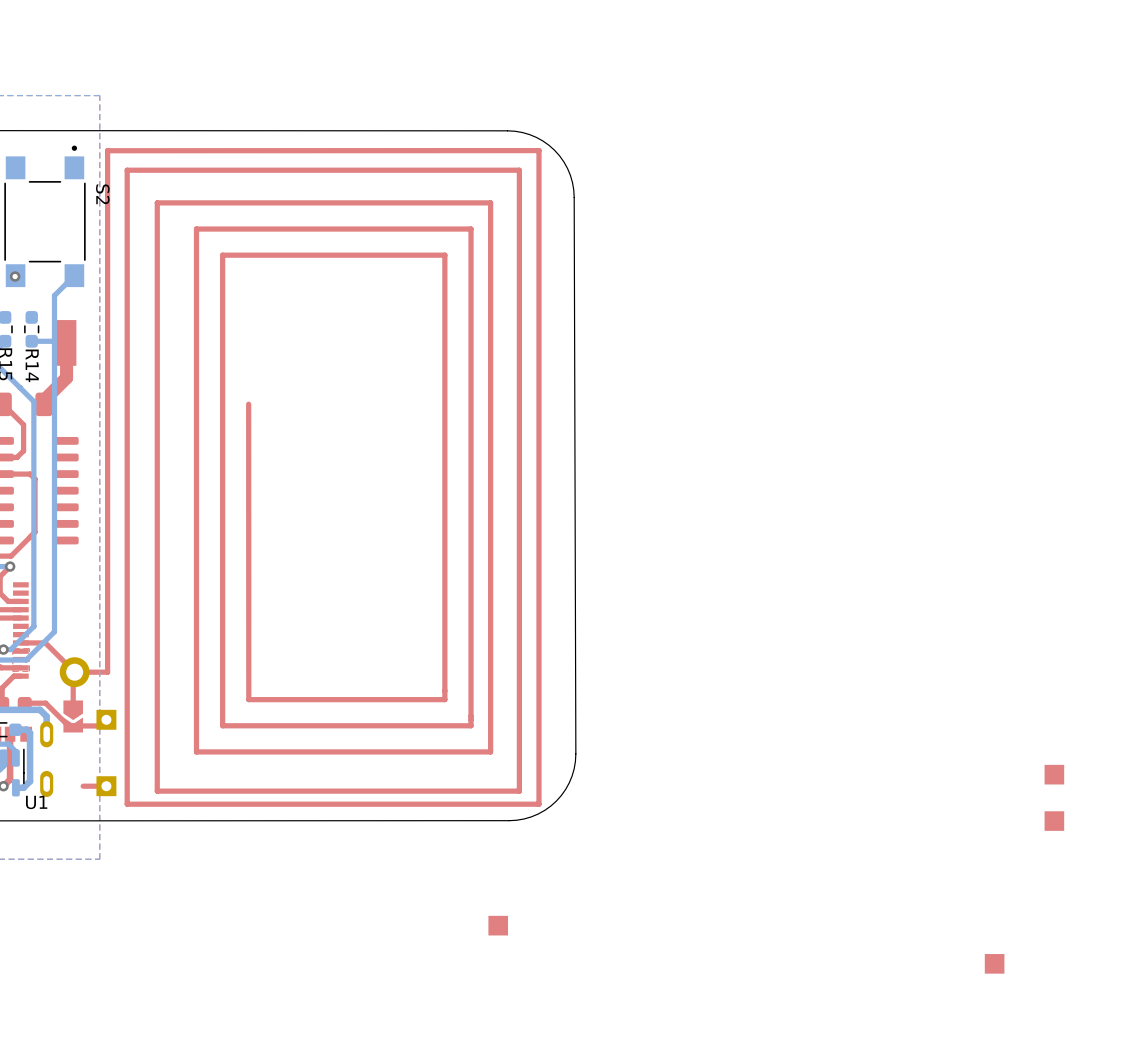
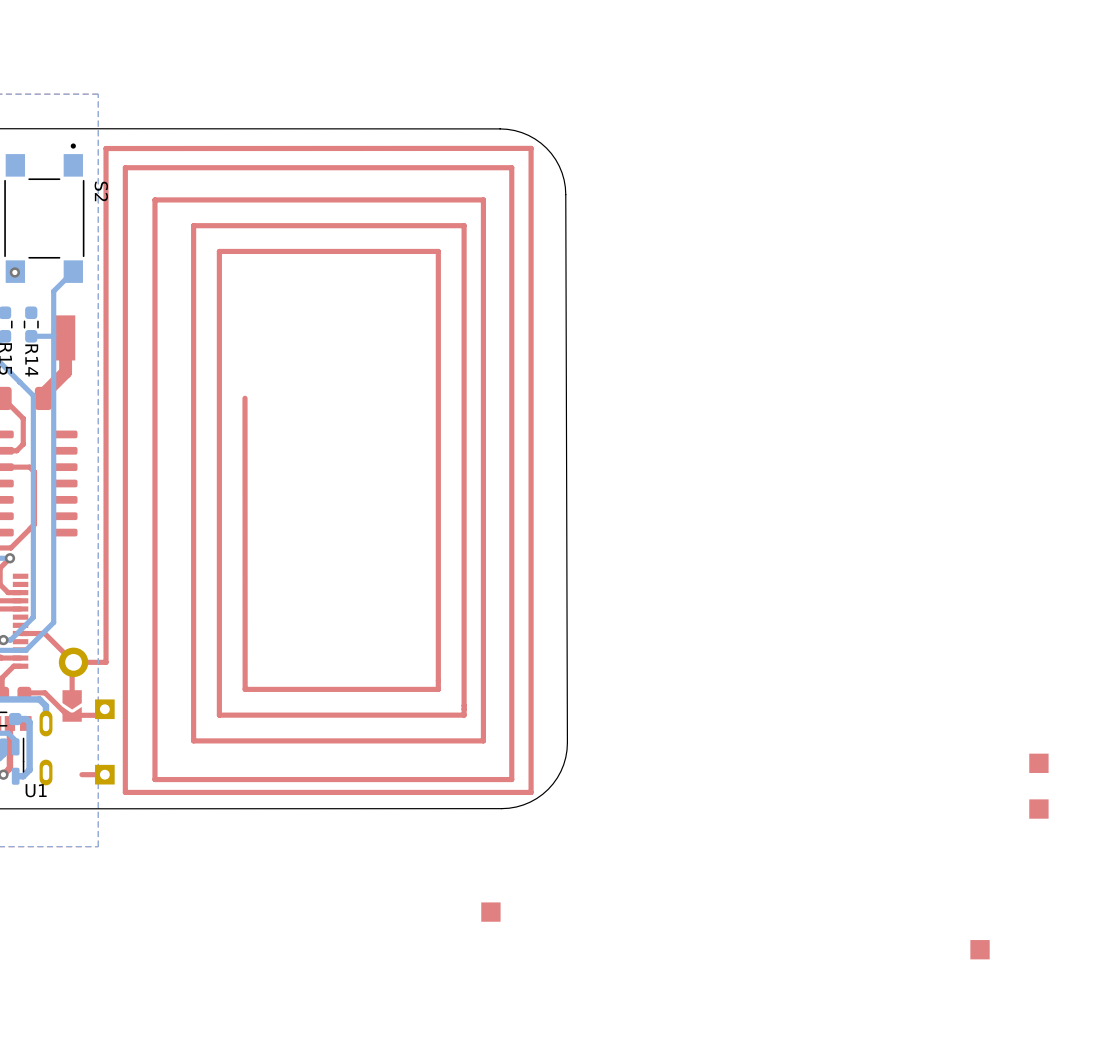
top zone outline: (29, 648) (29, 671) (12, 671) (12, 648) (29, 648) -> none

